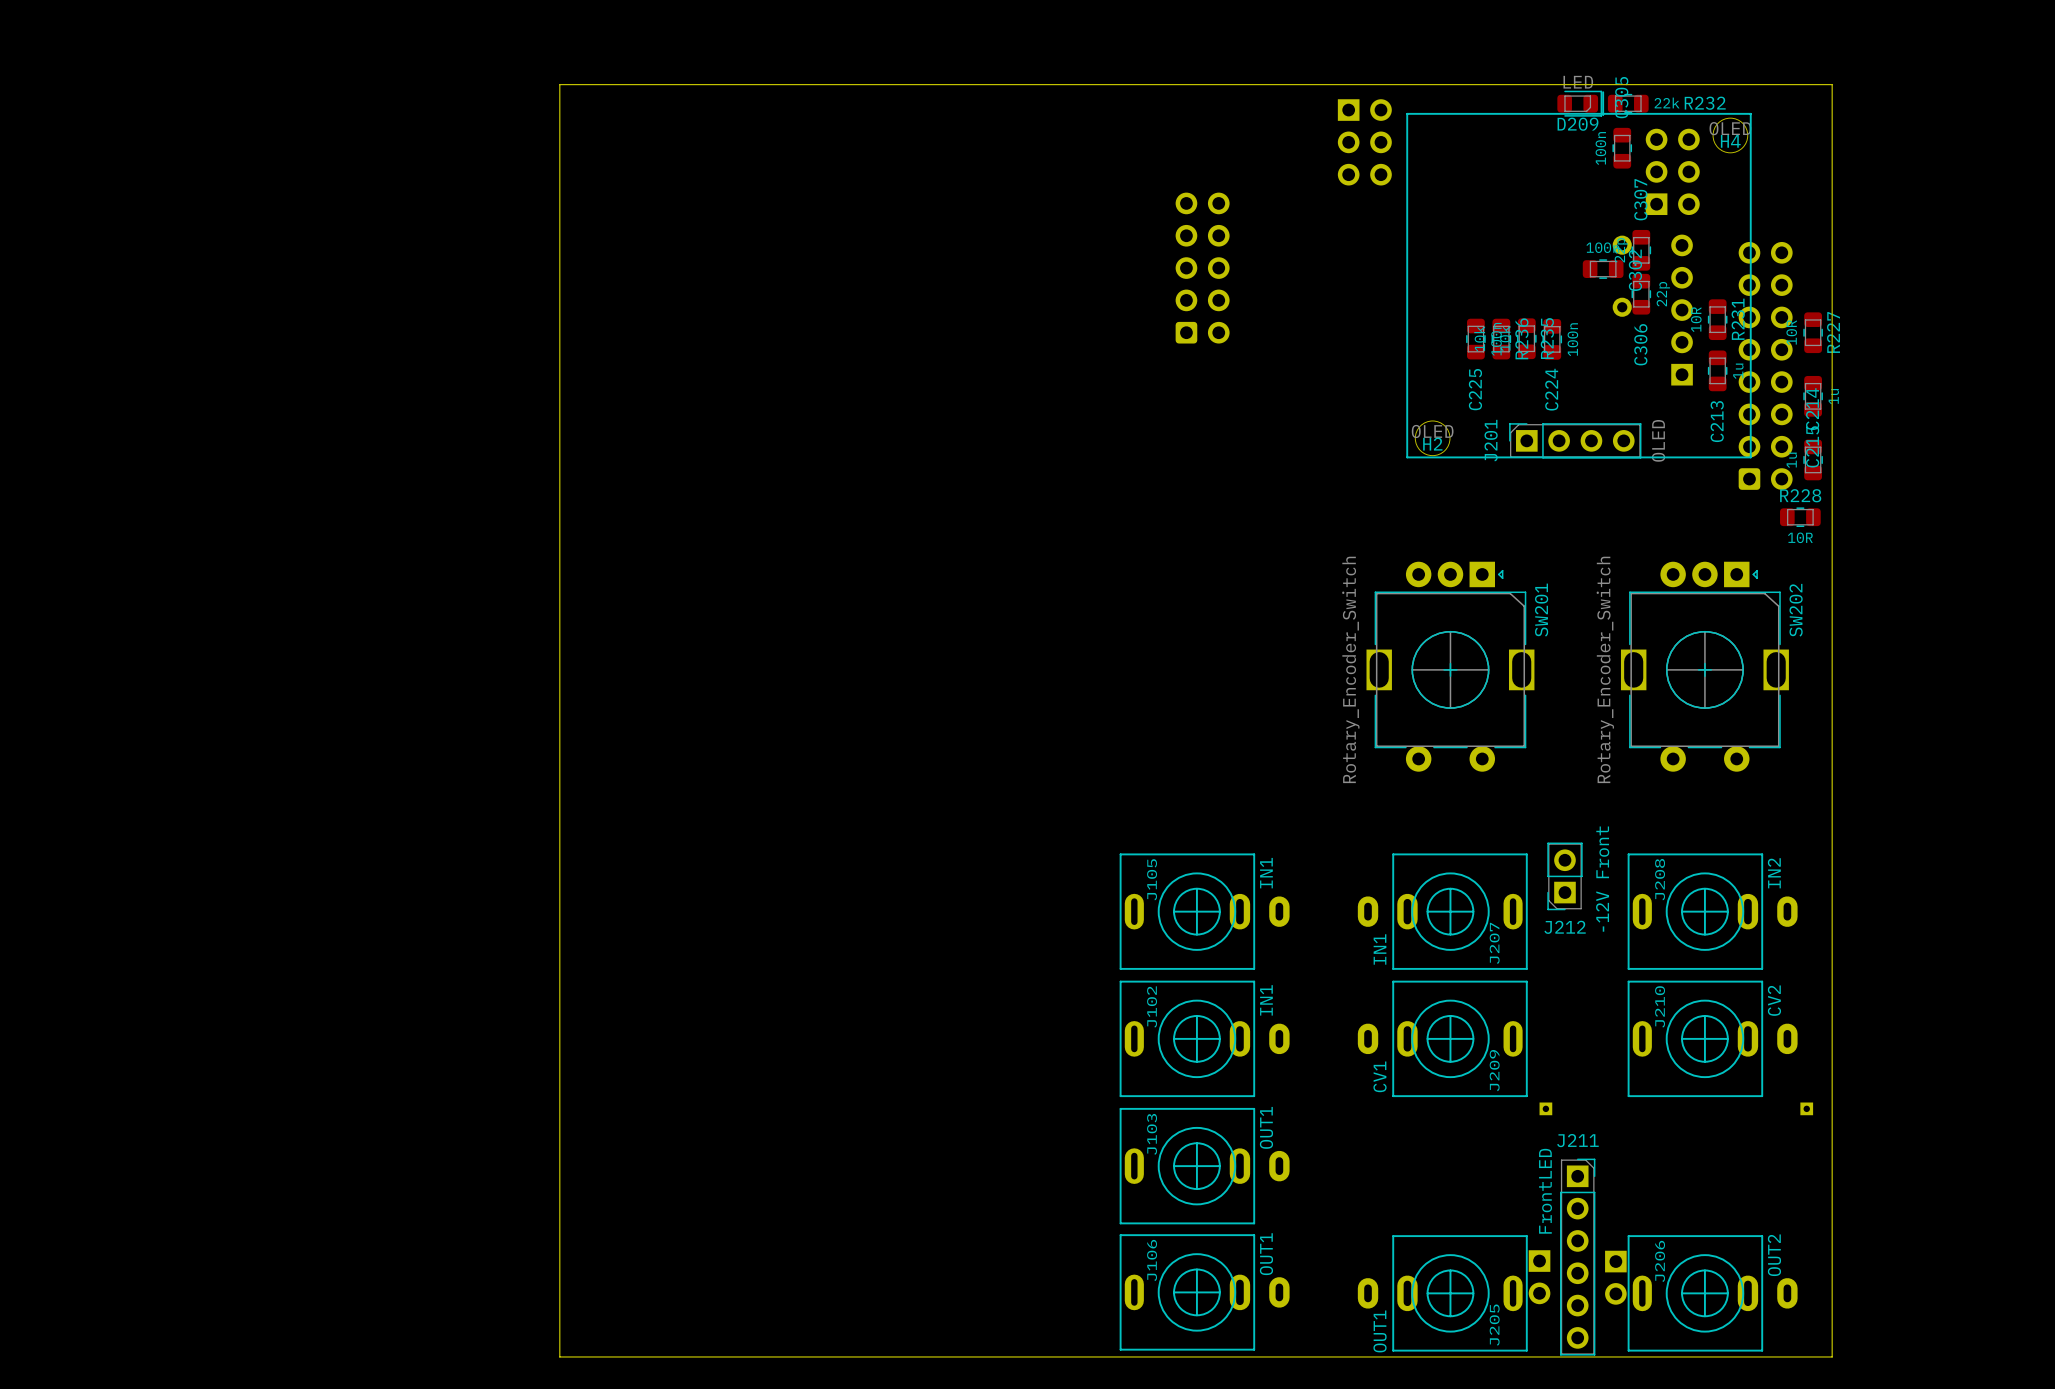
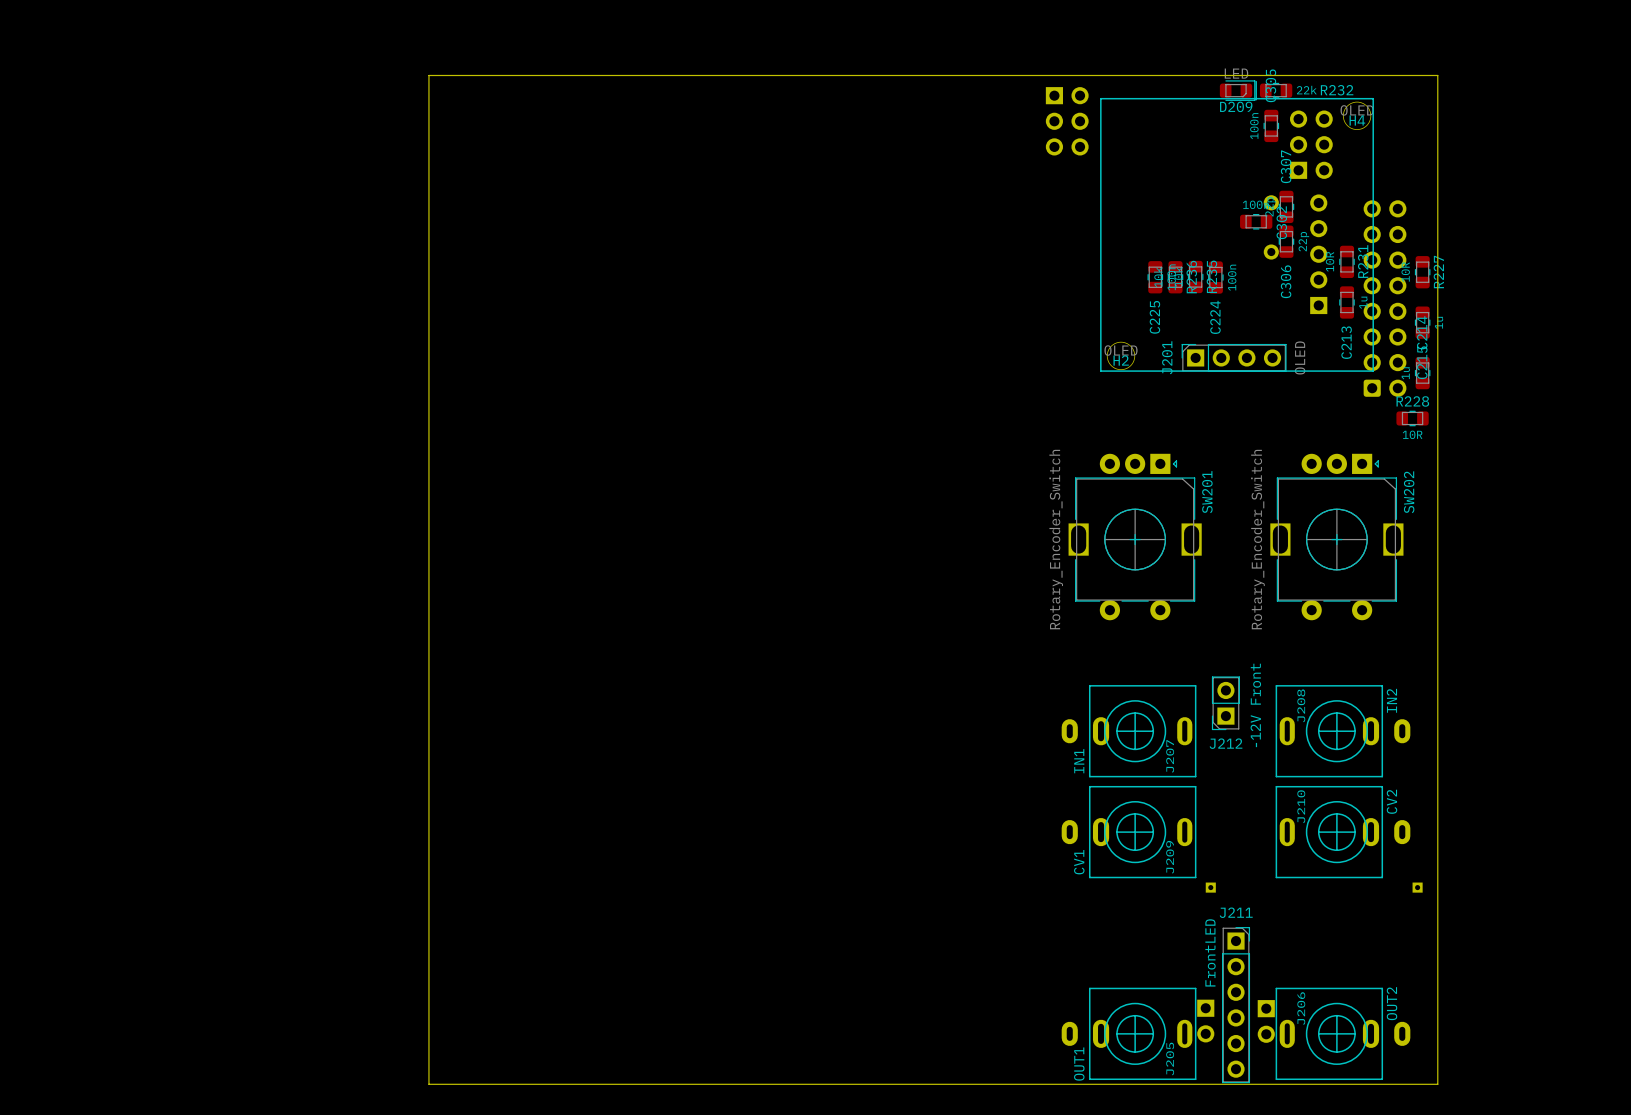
part: (1202, 268) -> none
J105: IN1 (1204, 911) -> none
J102: IN1 (1204, 1038) -> none
J103: OUT1 (1204, 1166) -> none
J106: OUT1 (1204, 1292) -> none

